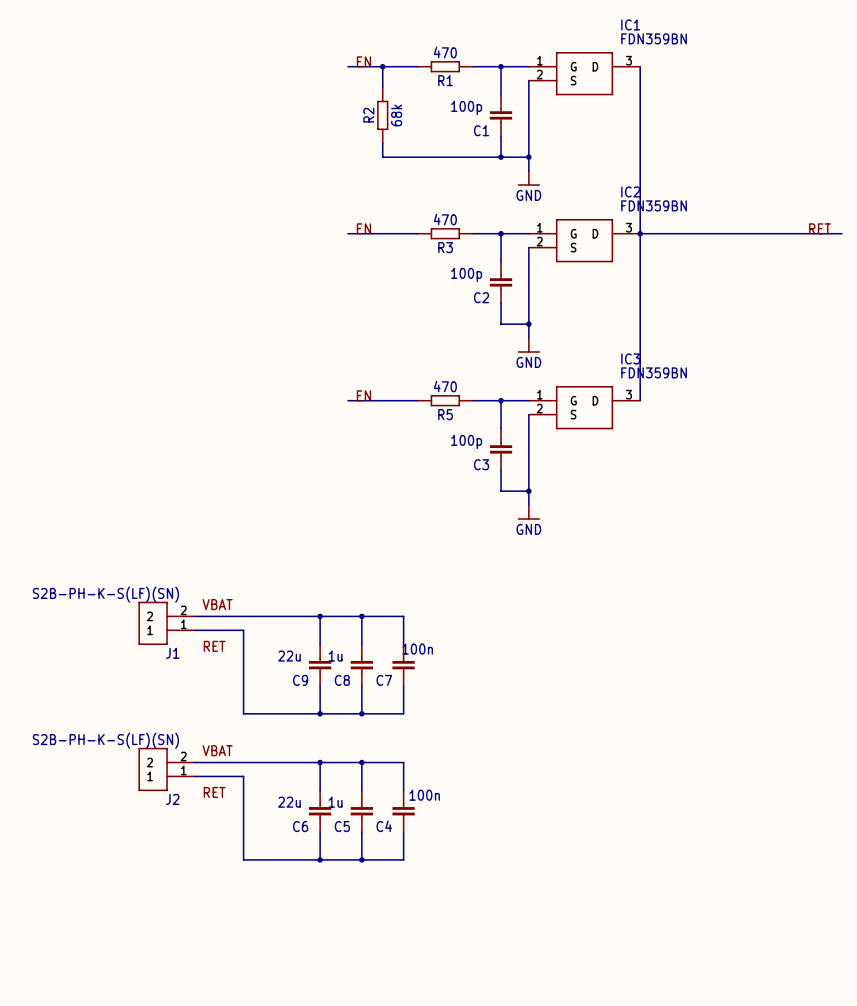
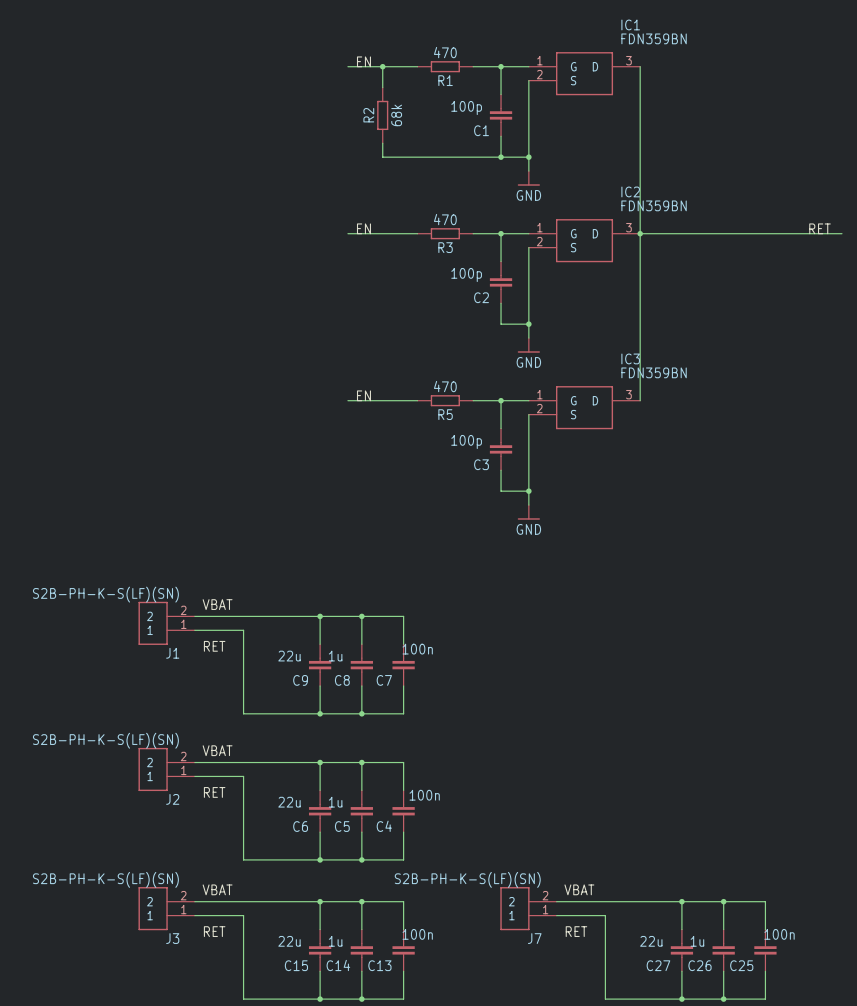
label: none -> VBAT (217, 889)
label: none -> VBAT (579, 889)
wire: none -> (194, 901) (403, 901) (403, 929)
wire: none -> (320, 901) (320, 929)
junction: none -> (320, 901)
wire: none -> (361, 901) (361, 929)
junction: none -> (361, 901)
wire: none -> (556, 901) (765, 901) (765, 929)
wire: none -> (681, 901) (681, 929)
junction: none -> (681, 901)
wire: none -> (723, 901) (723, 929)
junction: none -> (723, 901)
J3: none -> S2B-PH-K-S(LF)(SN) (166, 908)
J7: none -> S2B-PH-K-S(LF)(SN) (528, 908)
wire: none -> (194, 915) (243, 915) (243, 999) (403, 999) (403, 971)
wire: none -> (556, 915) (605, 915) (605, 999) (765, 999) (765, 971)
label: none -> RET (214, 931)
label: none -> RET (576, 931)
C15: none -> 22u (320, 950)
C14: none -> 1u (361, 950)
C13: none -> 100n (403, 950)
C27: none -> 22u (681, 950)
C26: none -> 1u (723, 950)
C25: none -> 100n (765, 950)
wire: none -> (320, 971) (320, 999)
wire: none -> (361, 971) (361, 999)
wire: none -> (681, 971) (681, 999)
wire: none -> (723, 971) (723, 999)
junction: none -> (320, 999)
junction: none -> (361, 999)
junction: none -> (681, 999)
junction: none -> (723, 999)

